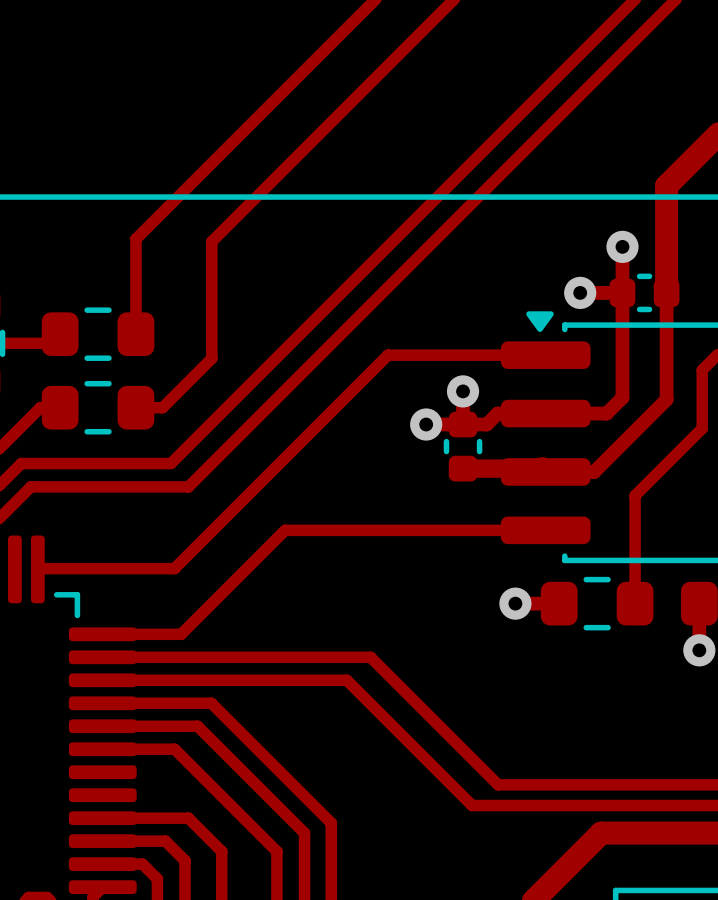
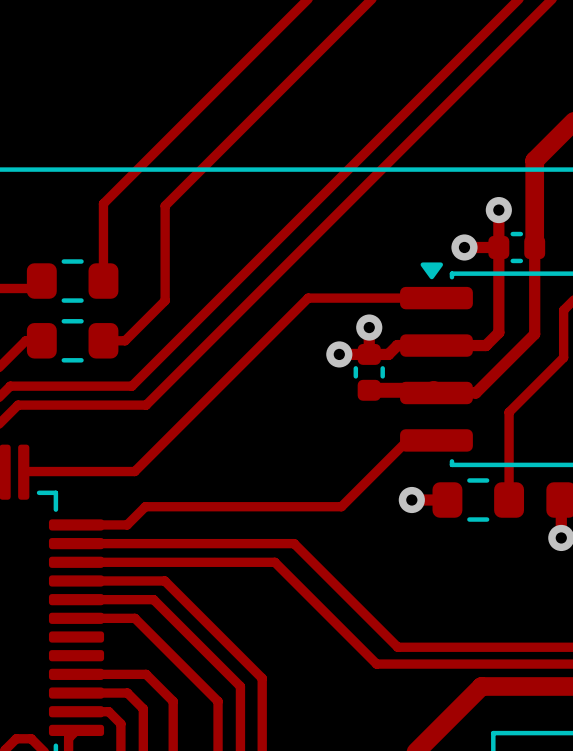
top track: (510, 530) (285, 530) (181, 634) (165, 634) -> (407, 440) (341, 506) (145, 506) (127, 524)

